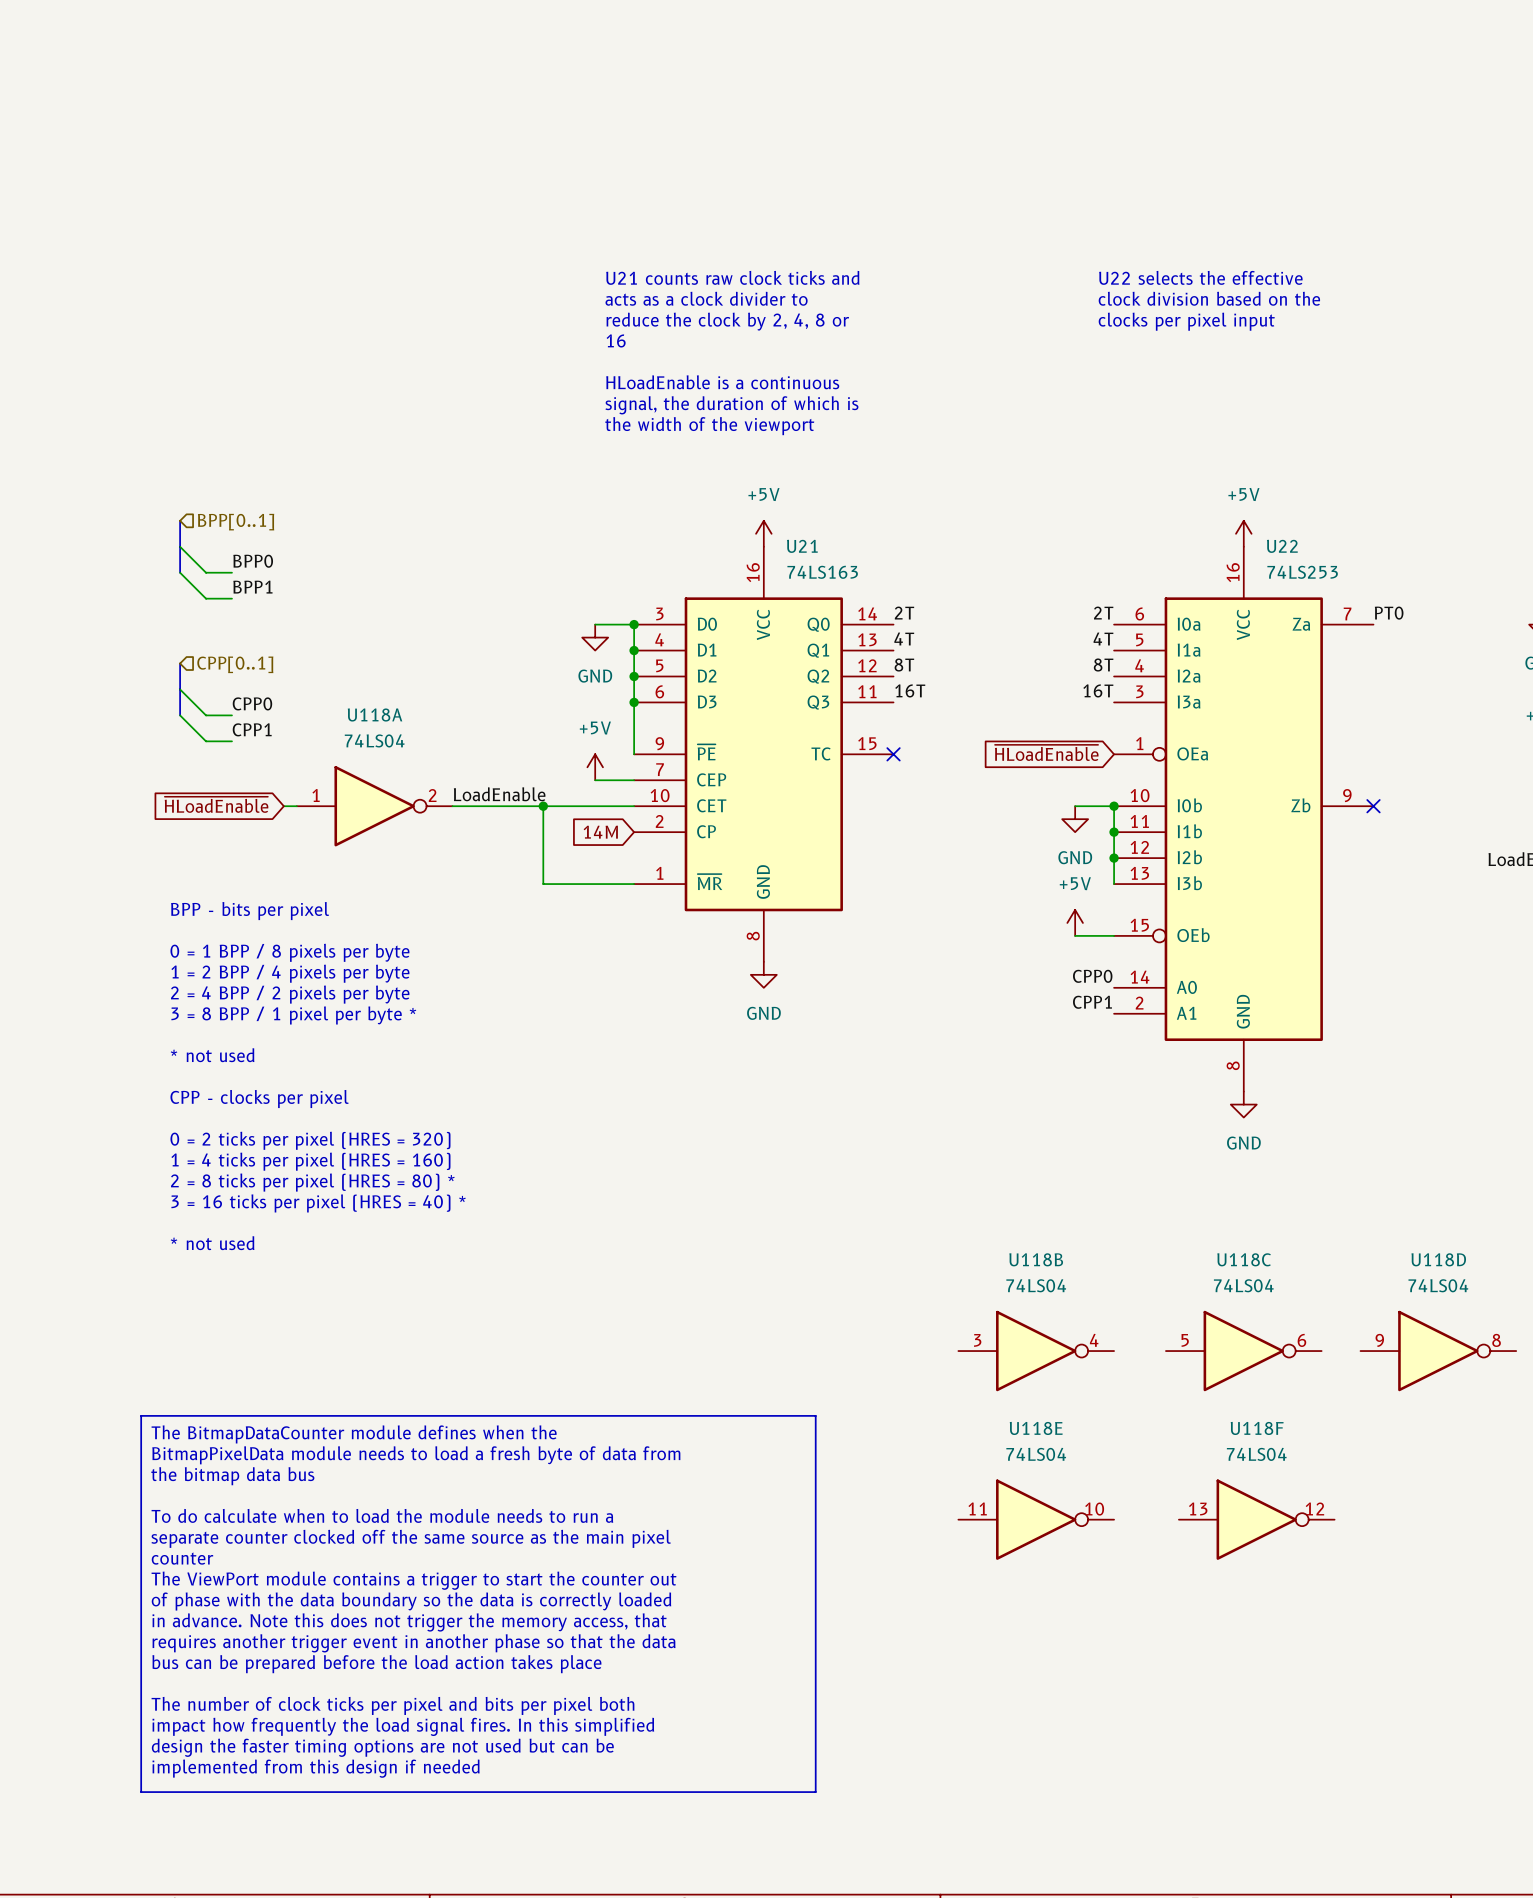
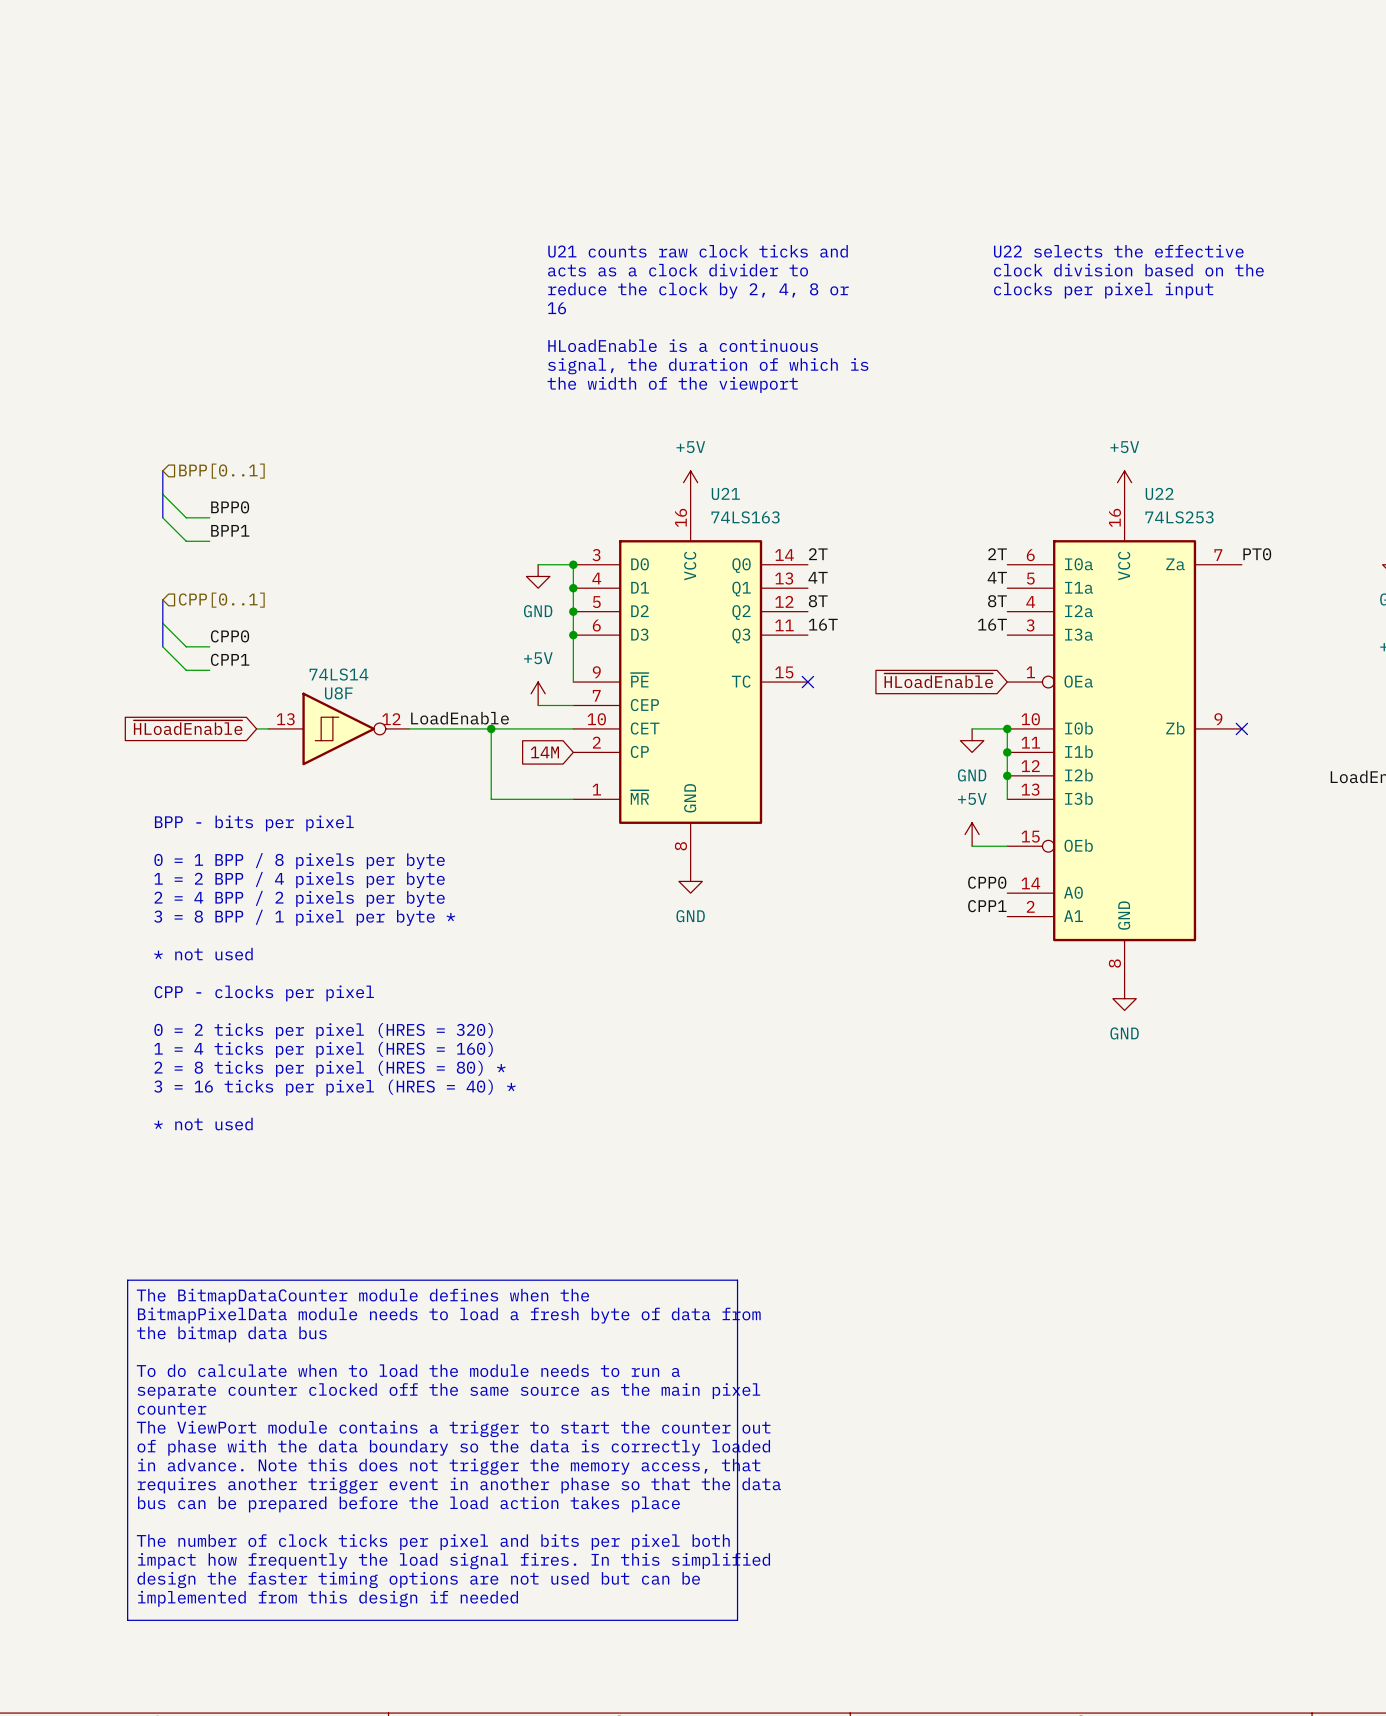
U118A: 74LS04 (374, 806) -> none
U8F: none -> 74LS14 (338, 728)
U118B: 74LS04 (1036, 1351) -> none
U118C: 74LS04 (1243, 1351) -> none
U118D: 74LS04 (1438, 1351) -> none
U118E: 74LS04 (1036, 1519) -> none
U118F: 74LS04 (1256, 1519) -> none

